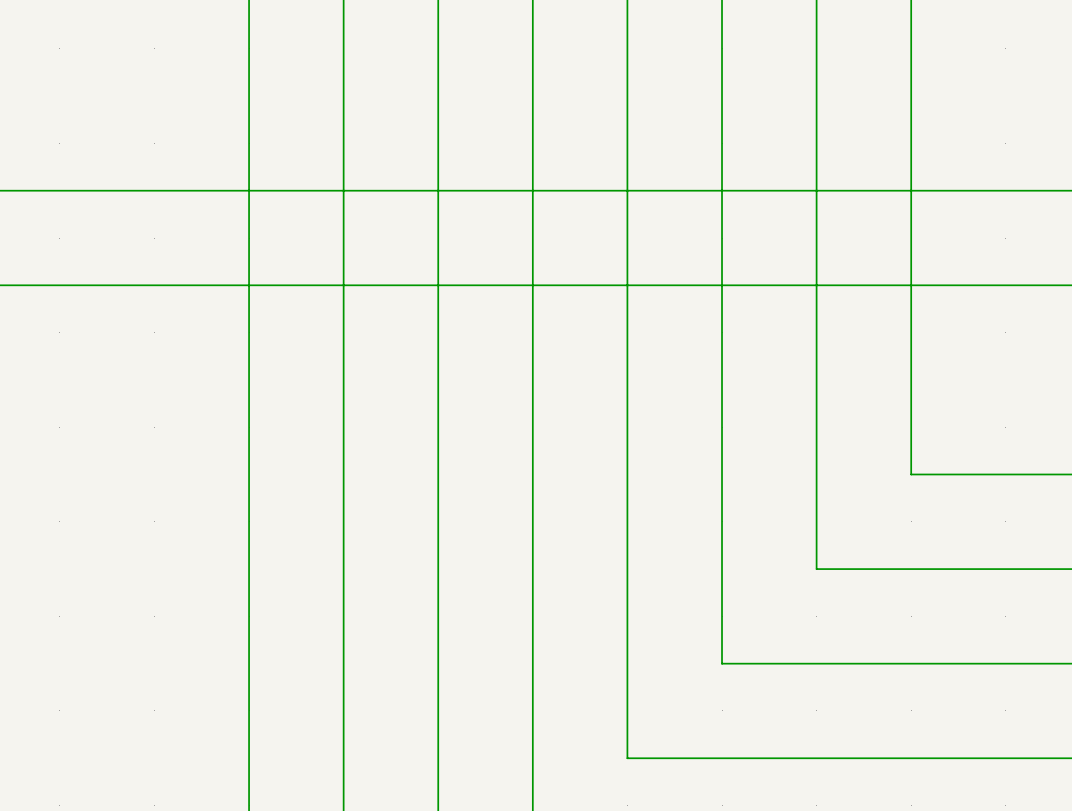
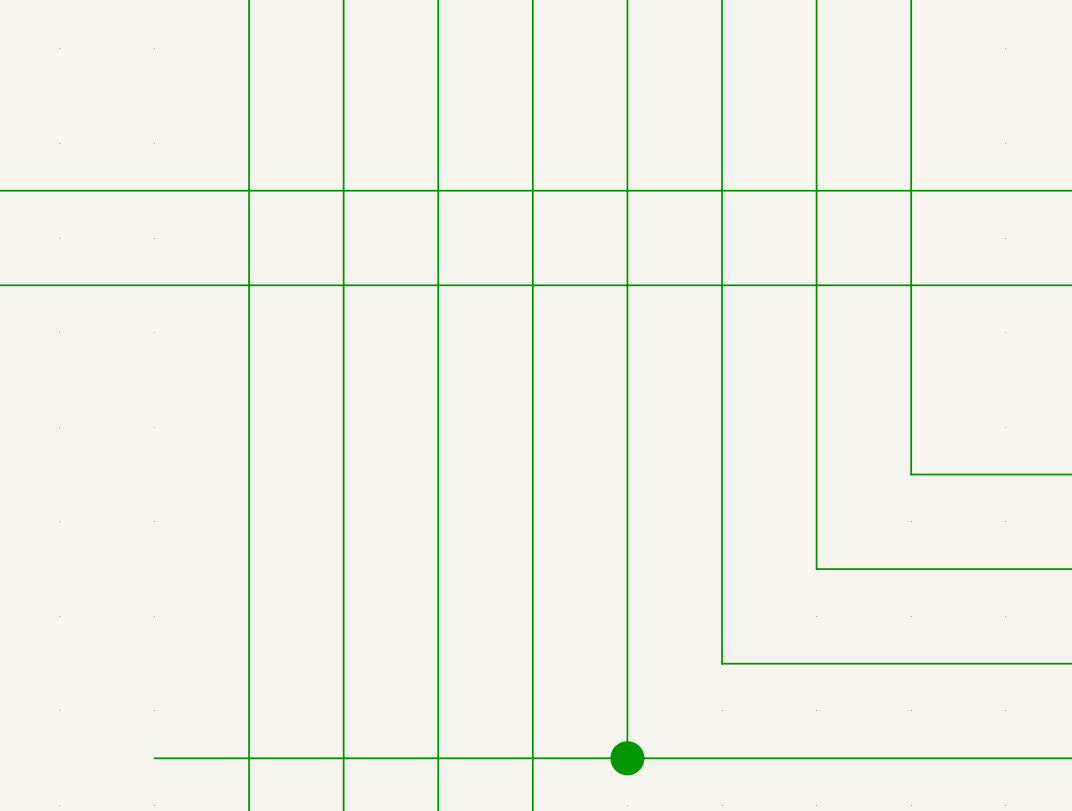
wire: none -> (154, 758) (627, 758)
junction: none -> (627, 758)

